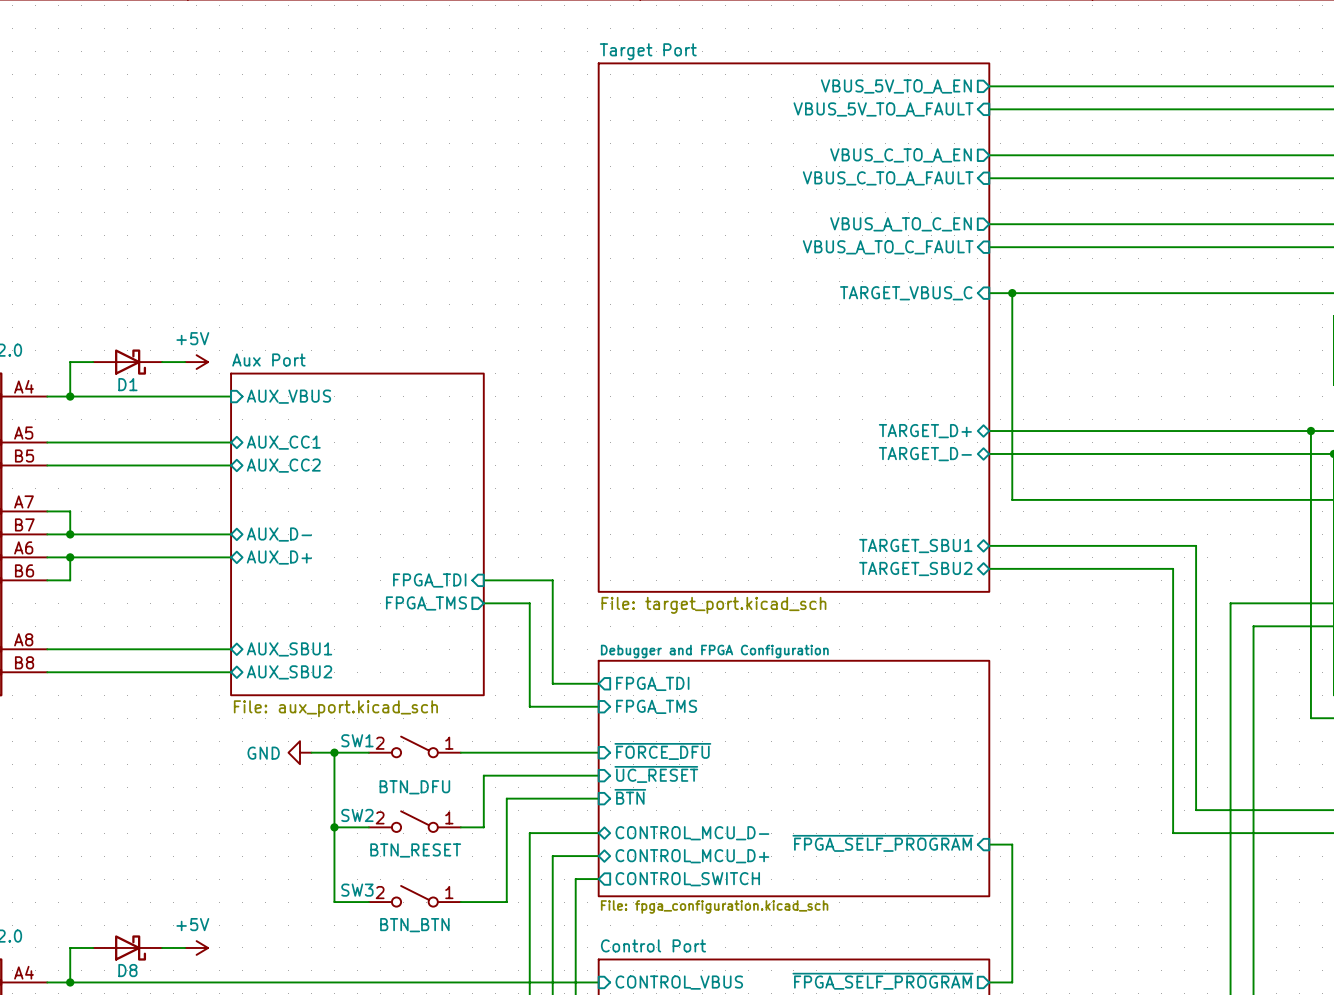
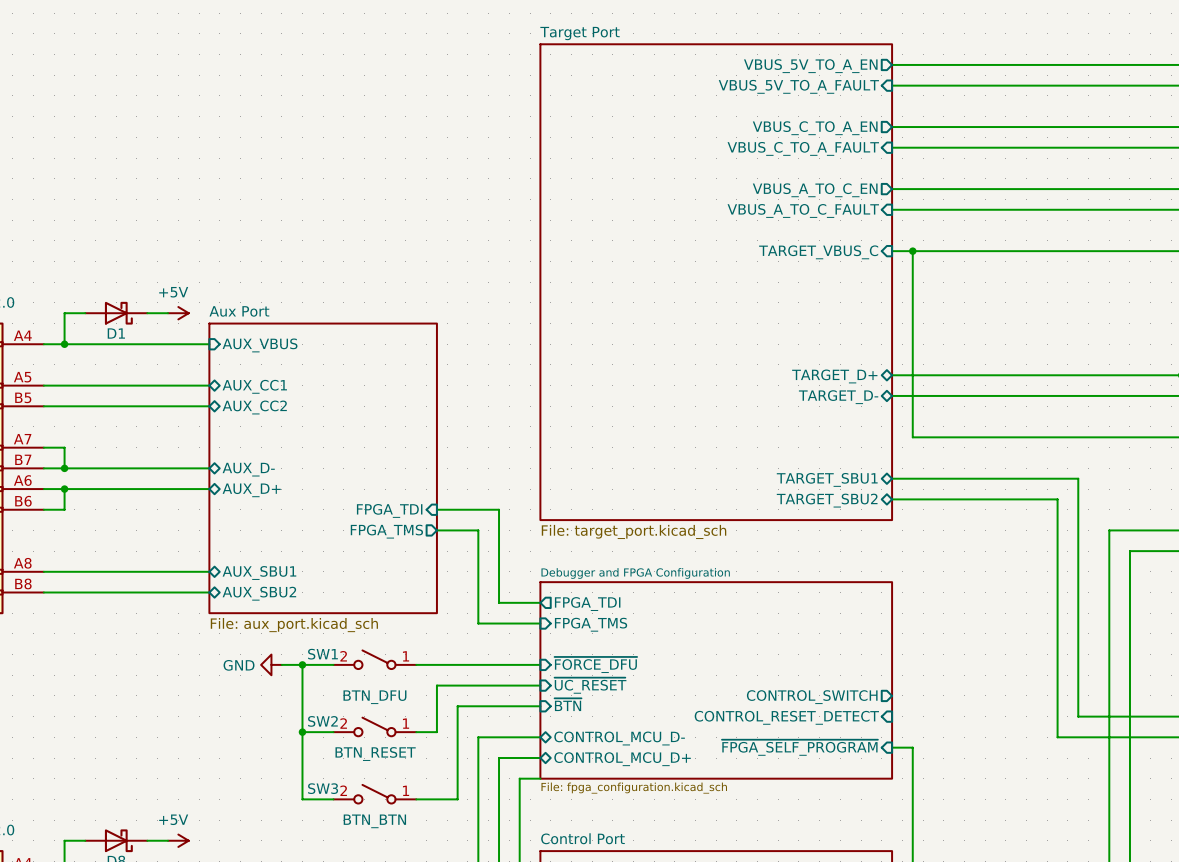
sheet Debugger and FPGA Configuration shape: [598, 660, 990, 897] -> [540, 582, 893, 779]
sheet pin: none -> CONTROL_SWITCH (812, 697)
sheet pin: none -> CONTROL_RESET_DETECT (786, 717)
sheet pin: CONTROL_SWITCH (687, 879) -> none

